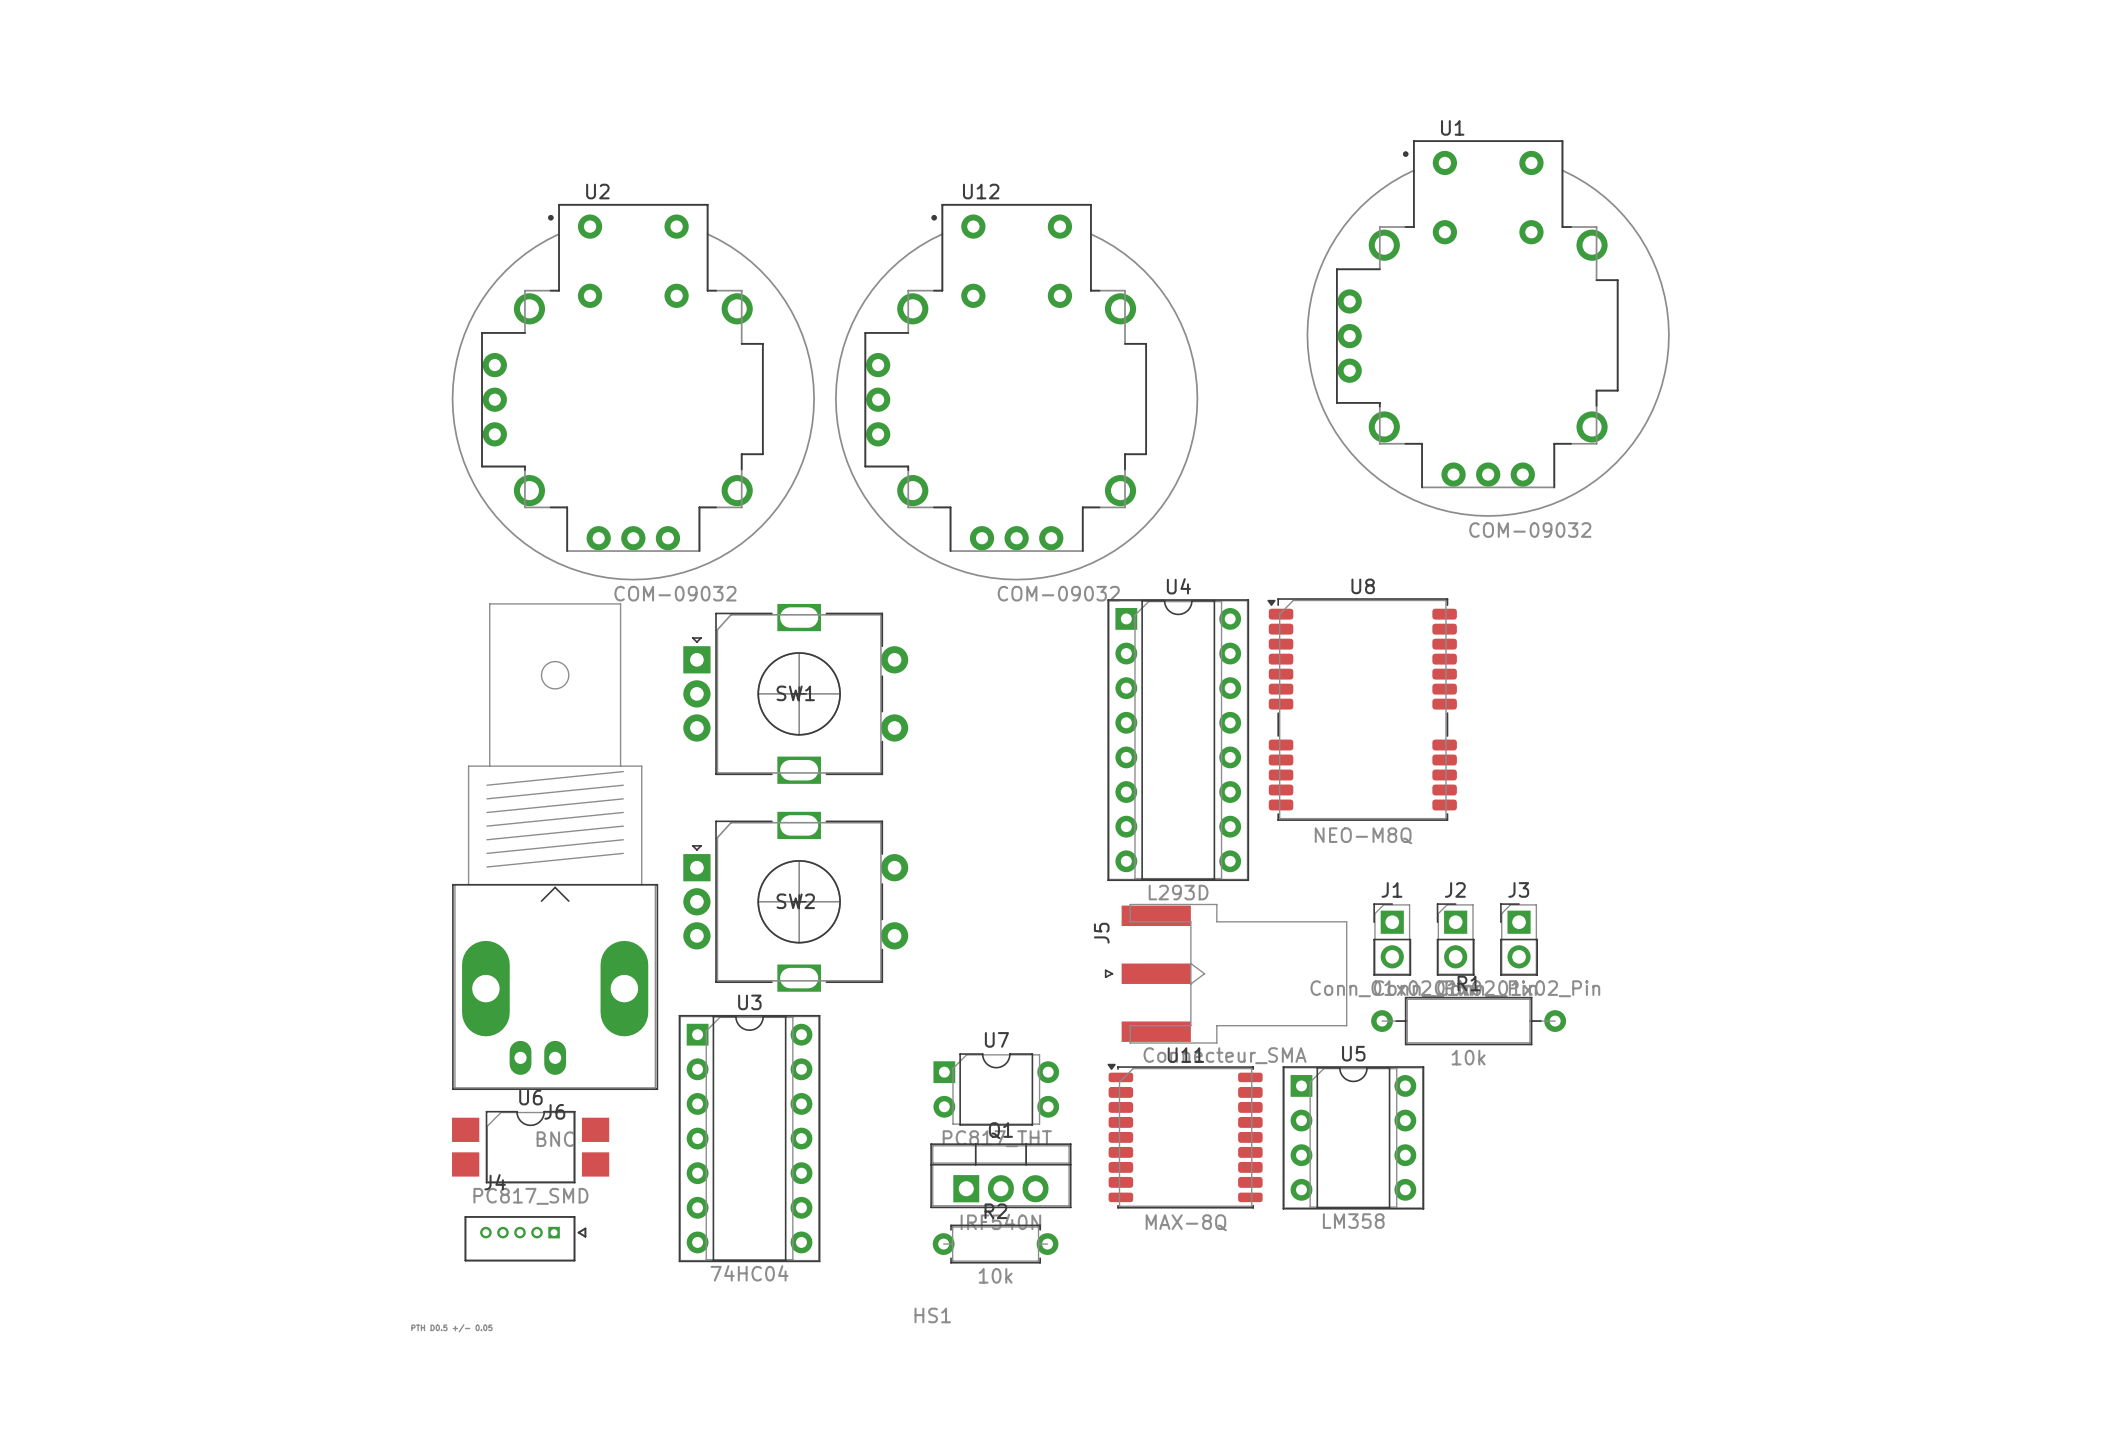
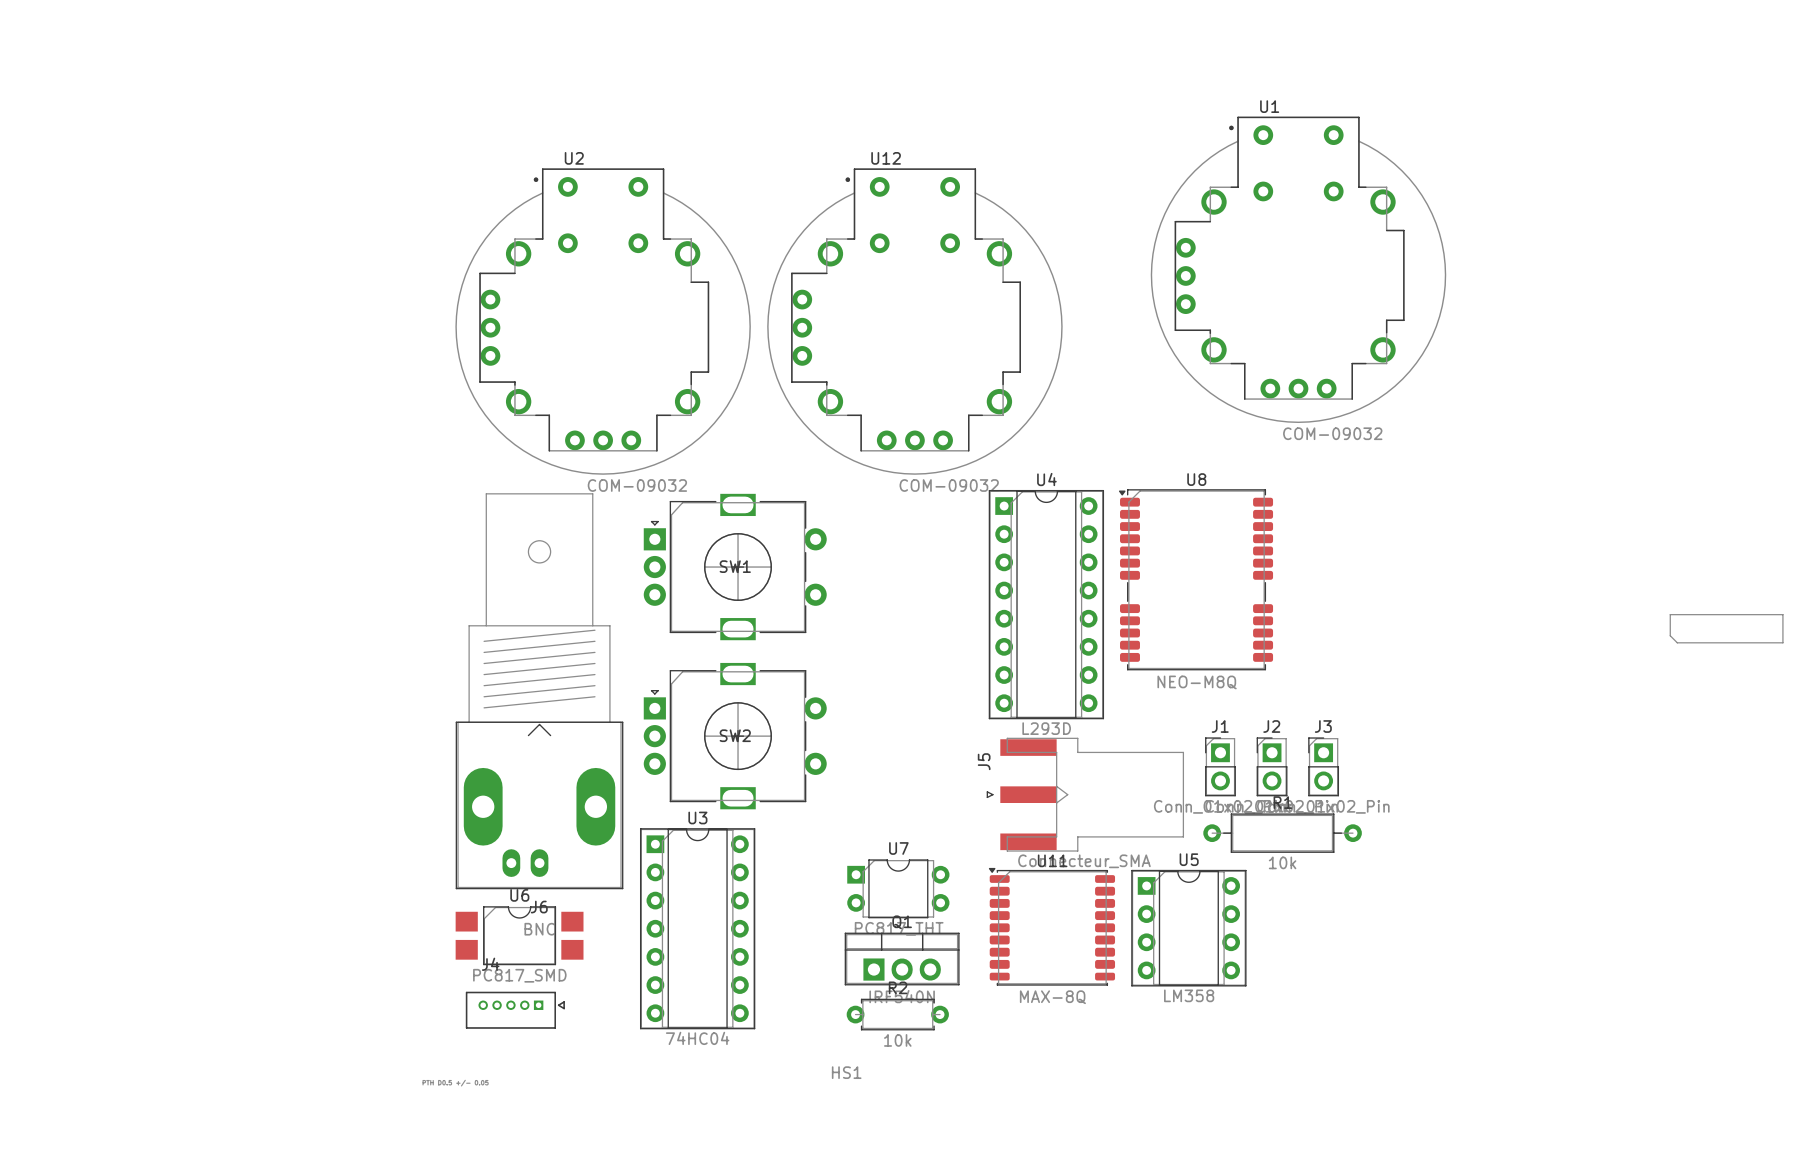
drawing: none -> [1669, 614, 1784, 644]

